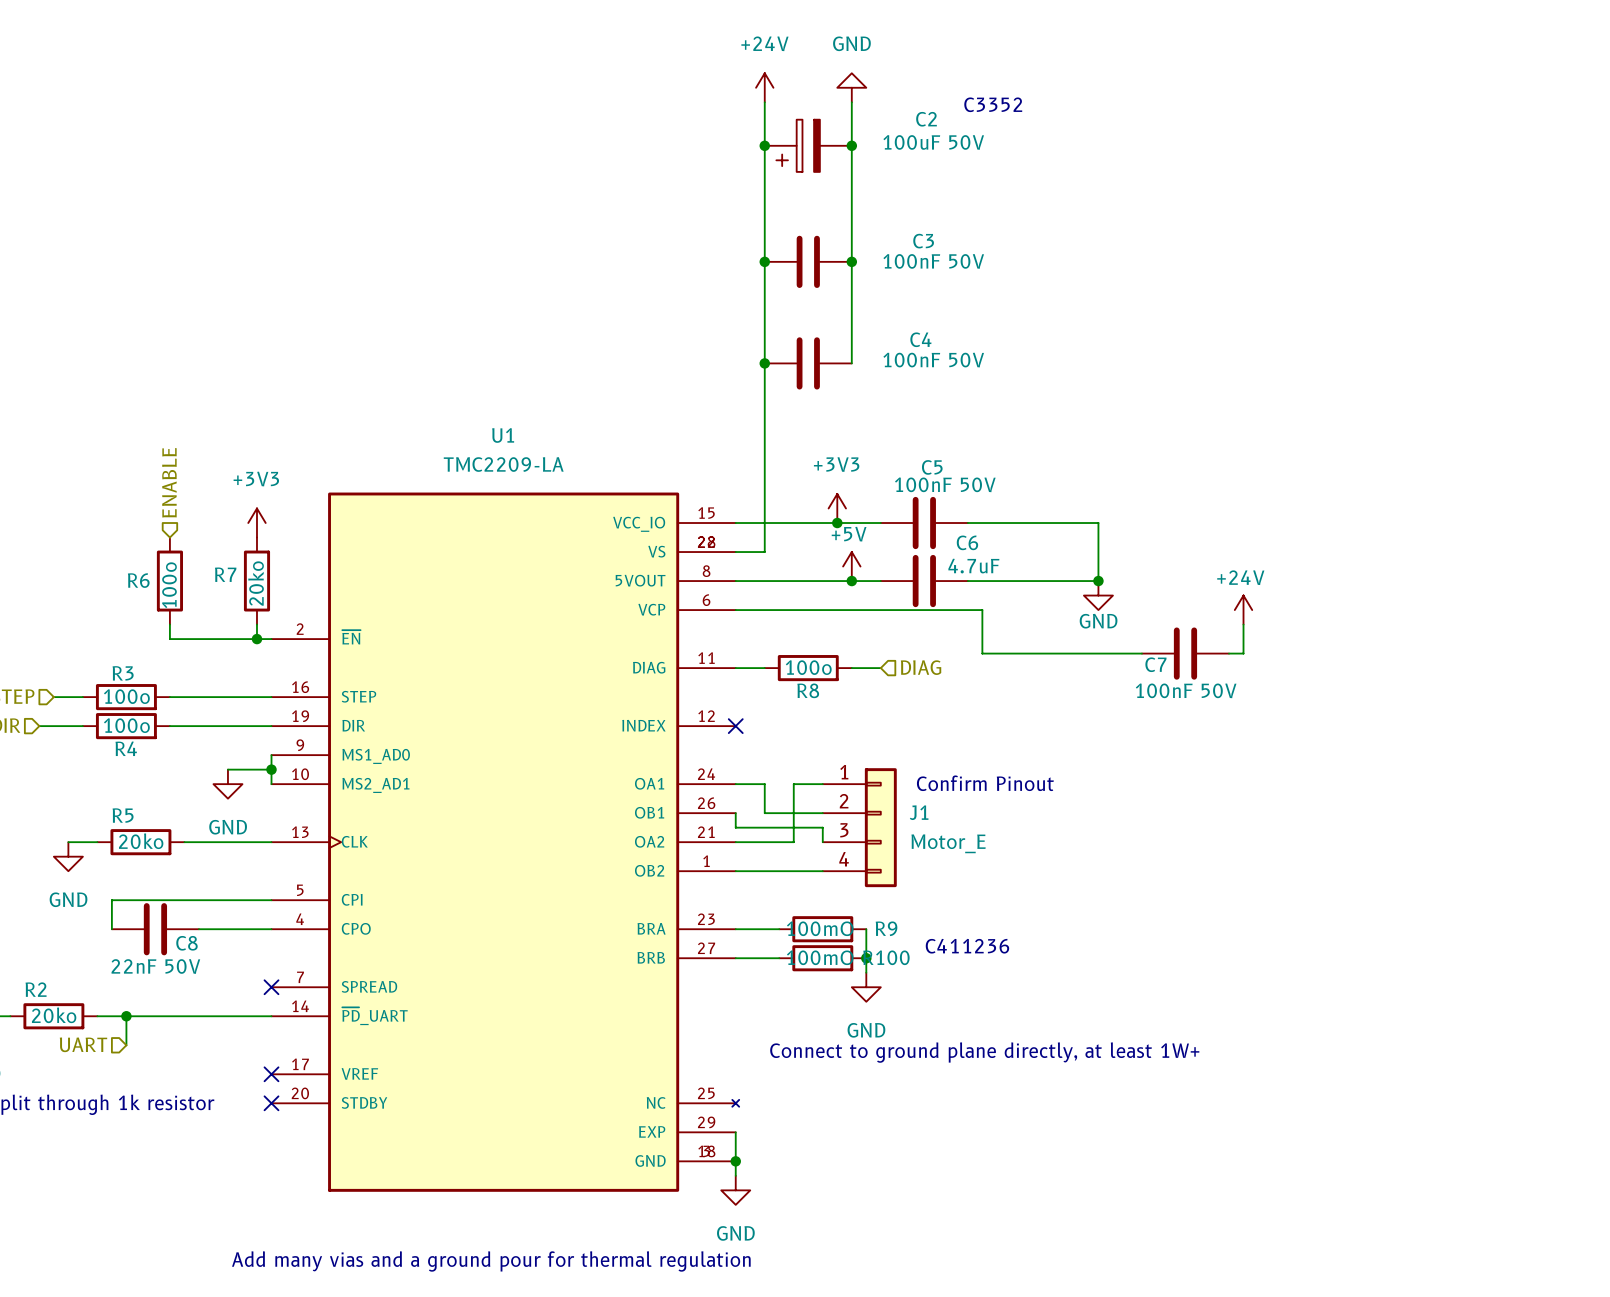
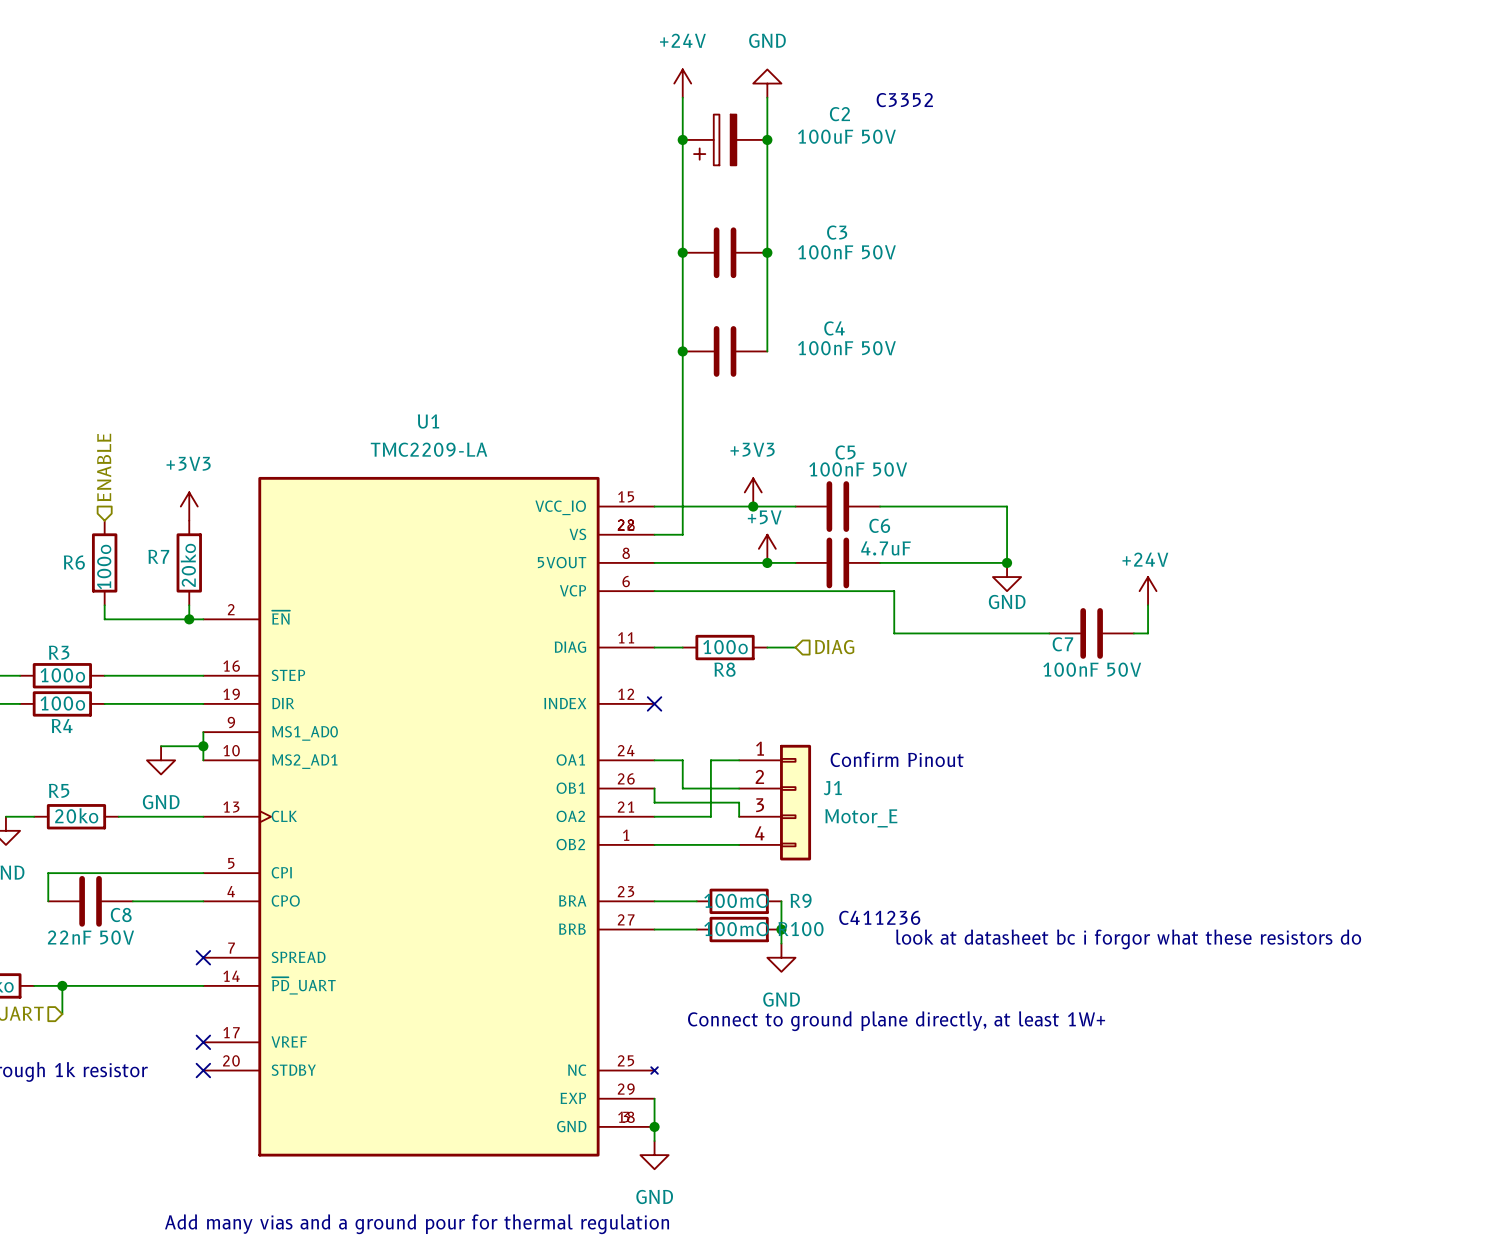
text: none -> look at datasheet bc i forgor what these resistors do (1128, 939)

